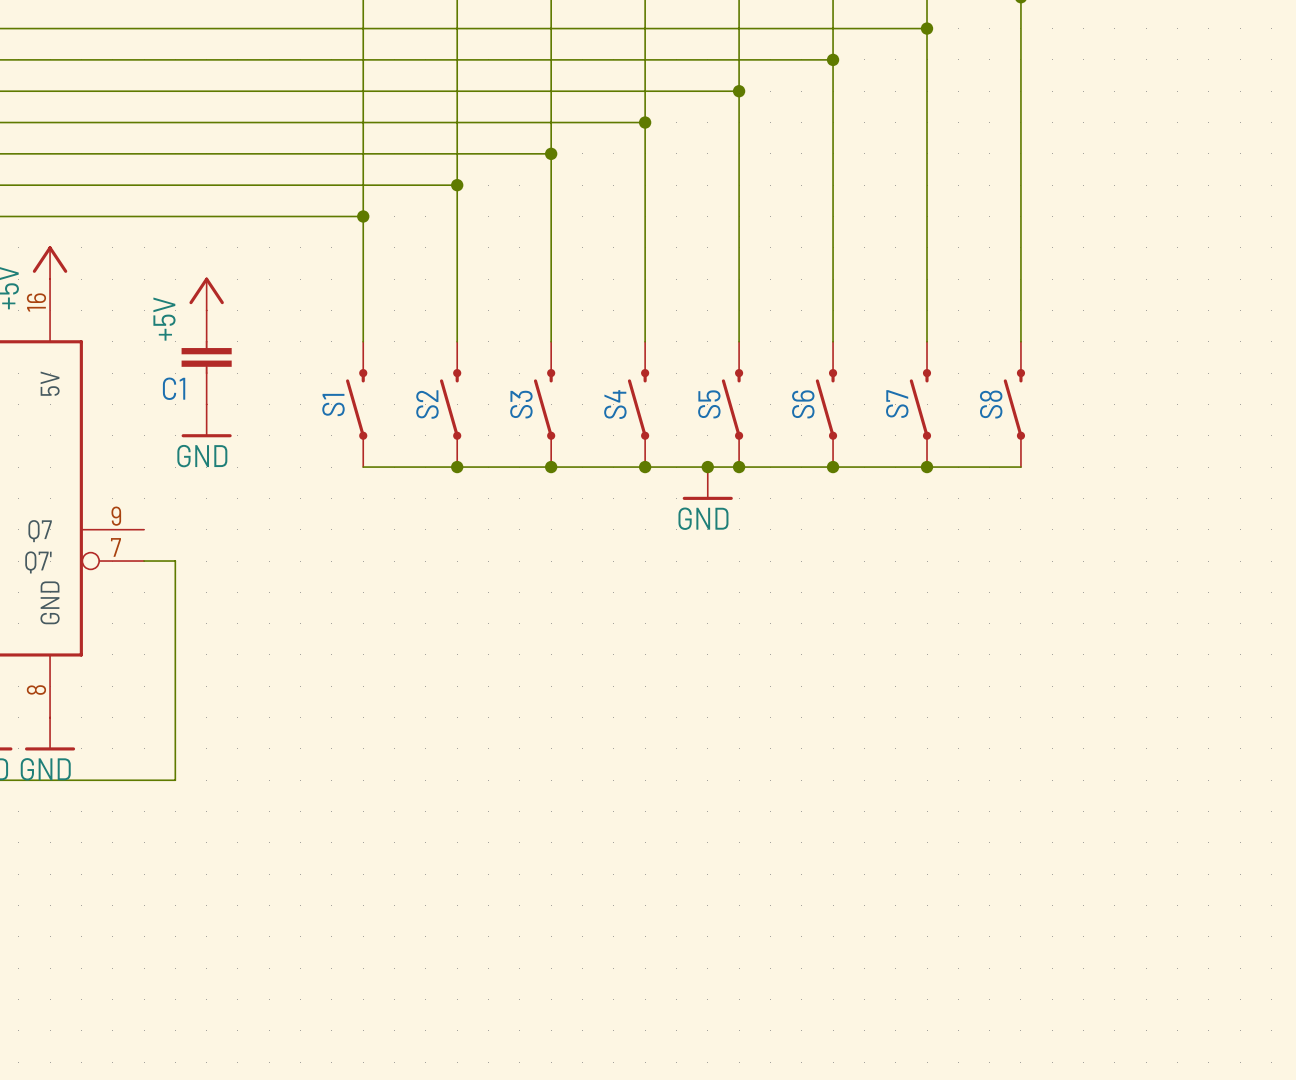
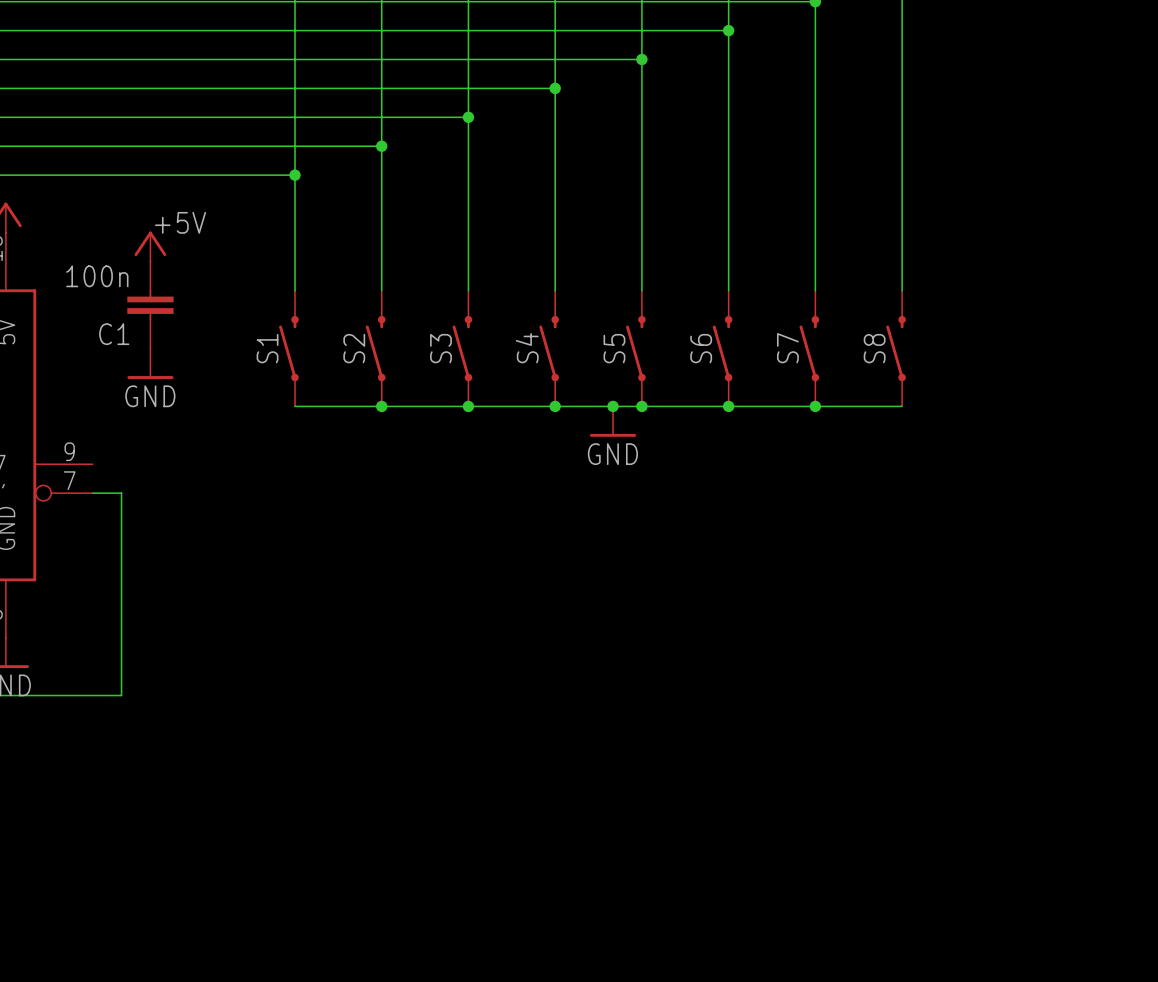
power symbol text rotation: 0° (164, 319) -> 90° clockwise (180, 222)
power symbol text position: +5V (164, 319) -> +5V (180, 222)
C1 value: none -> 100n (97, 276)

